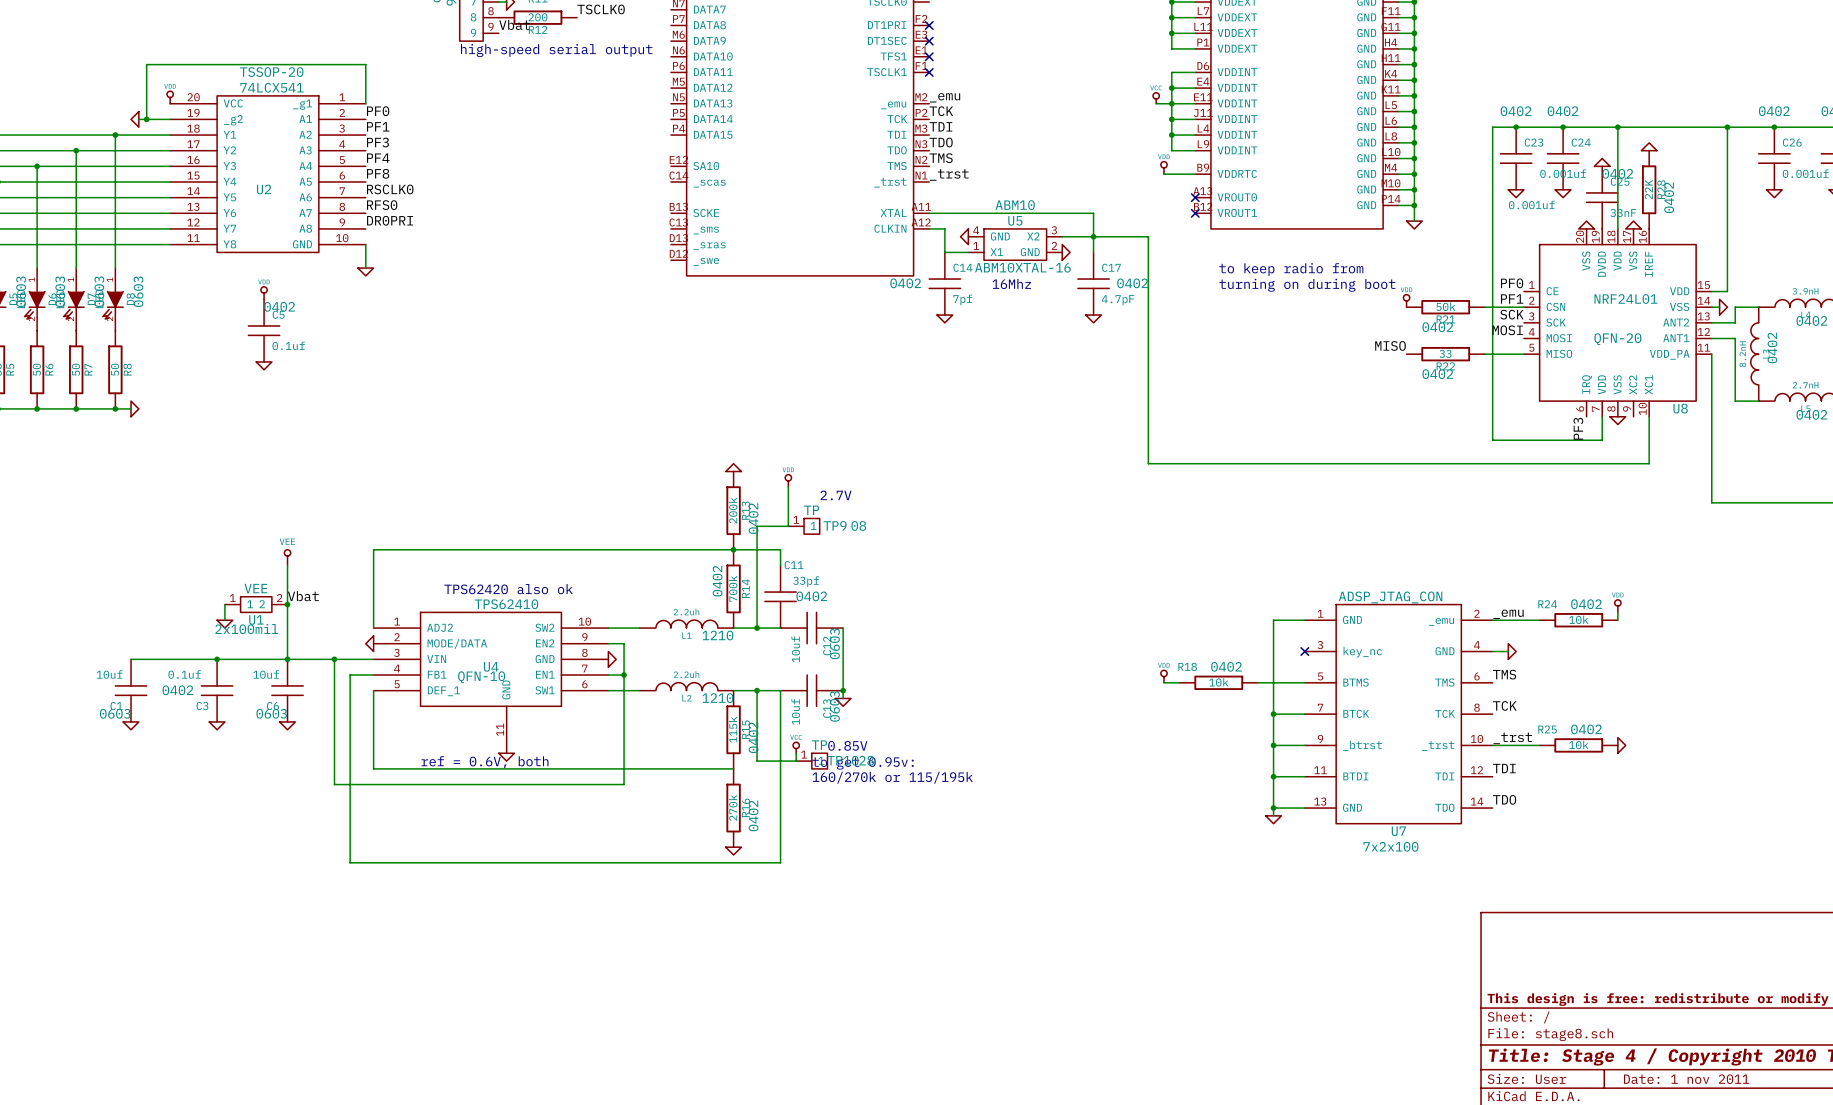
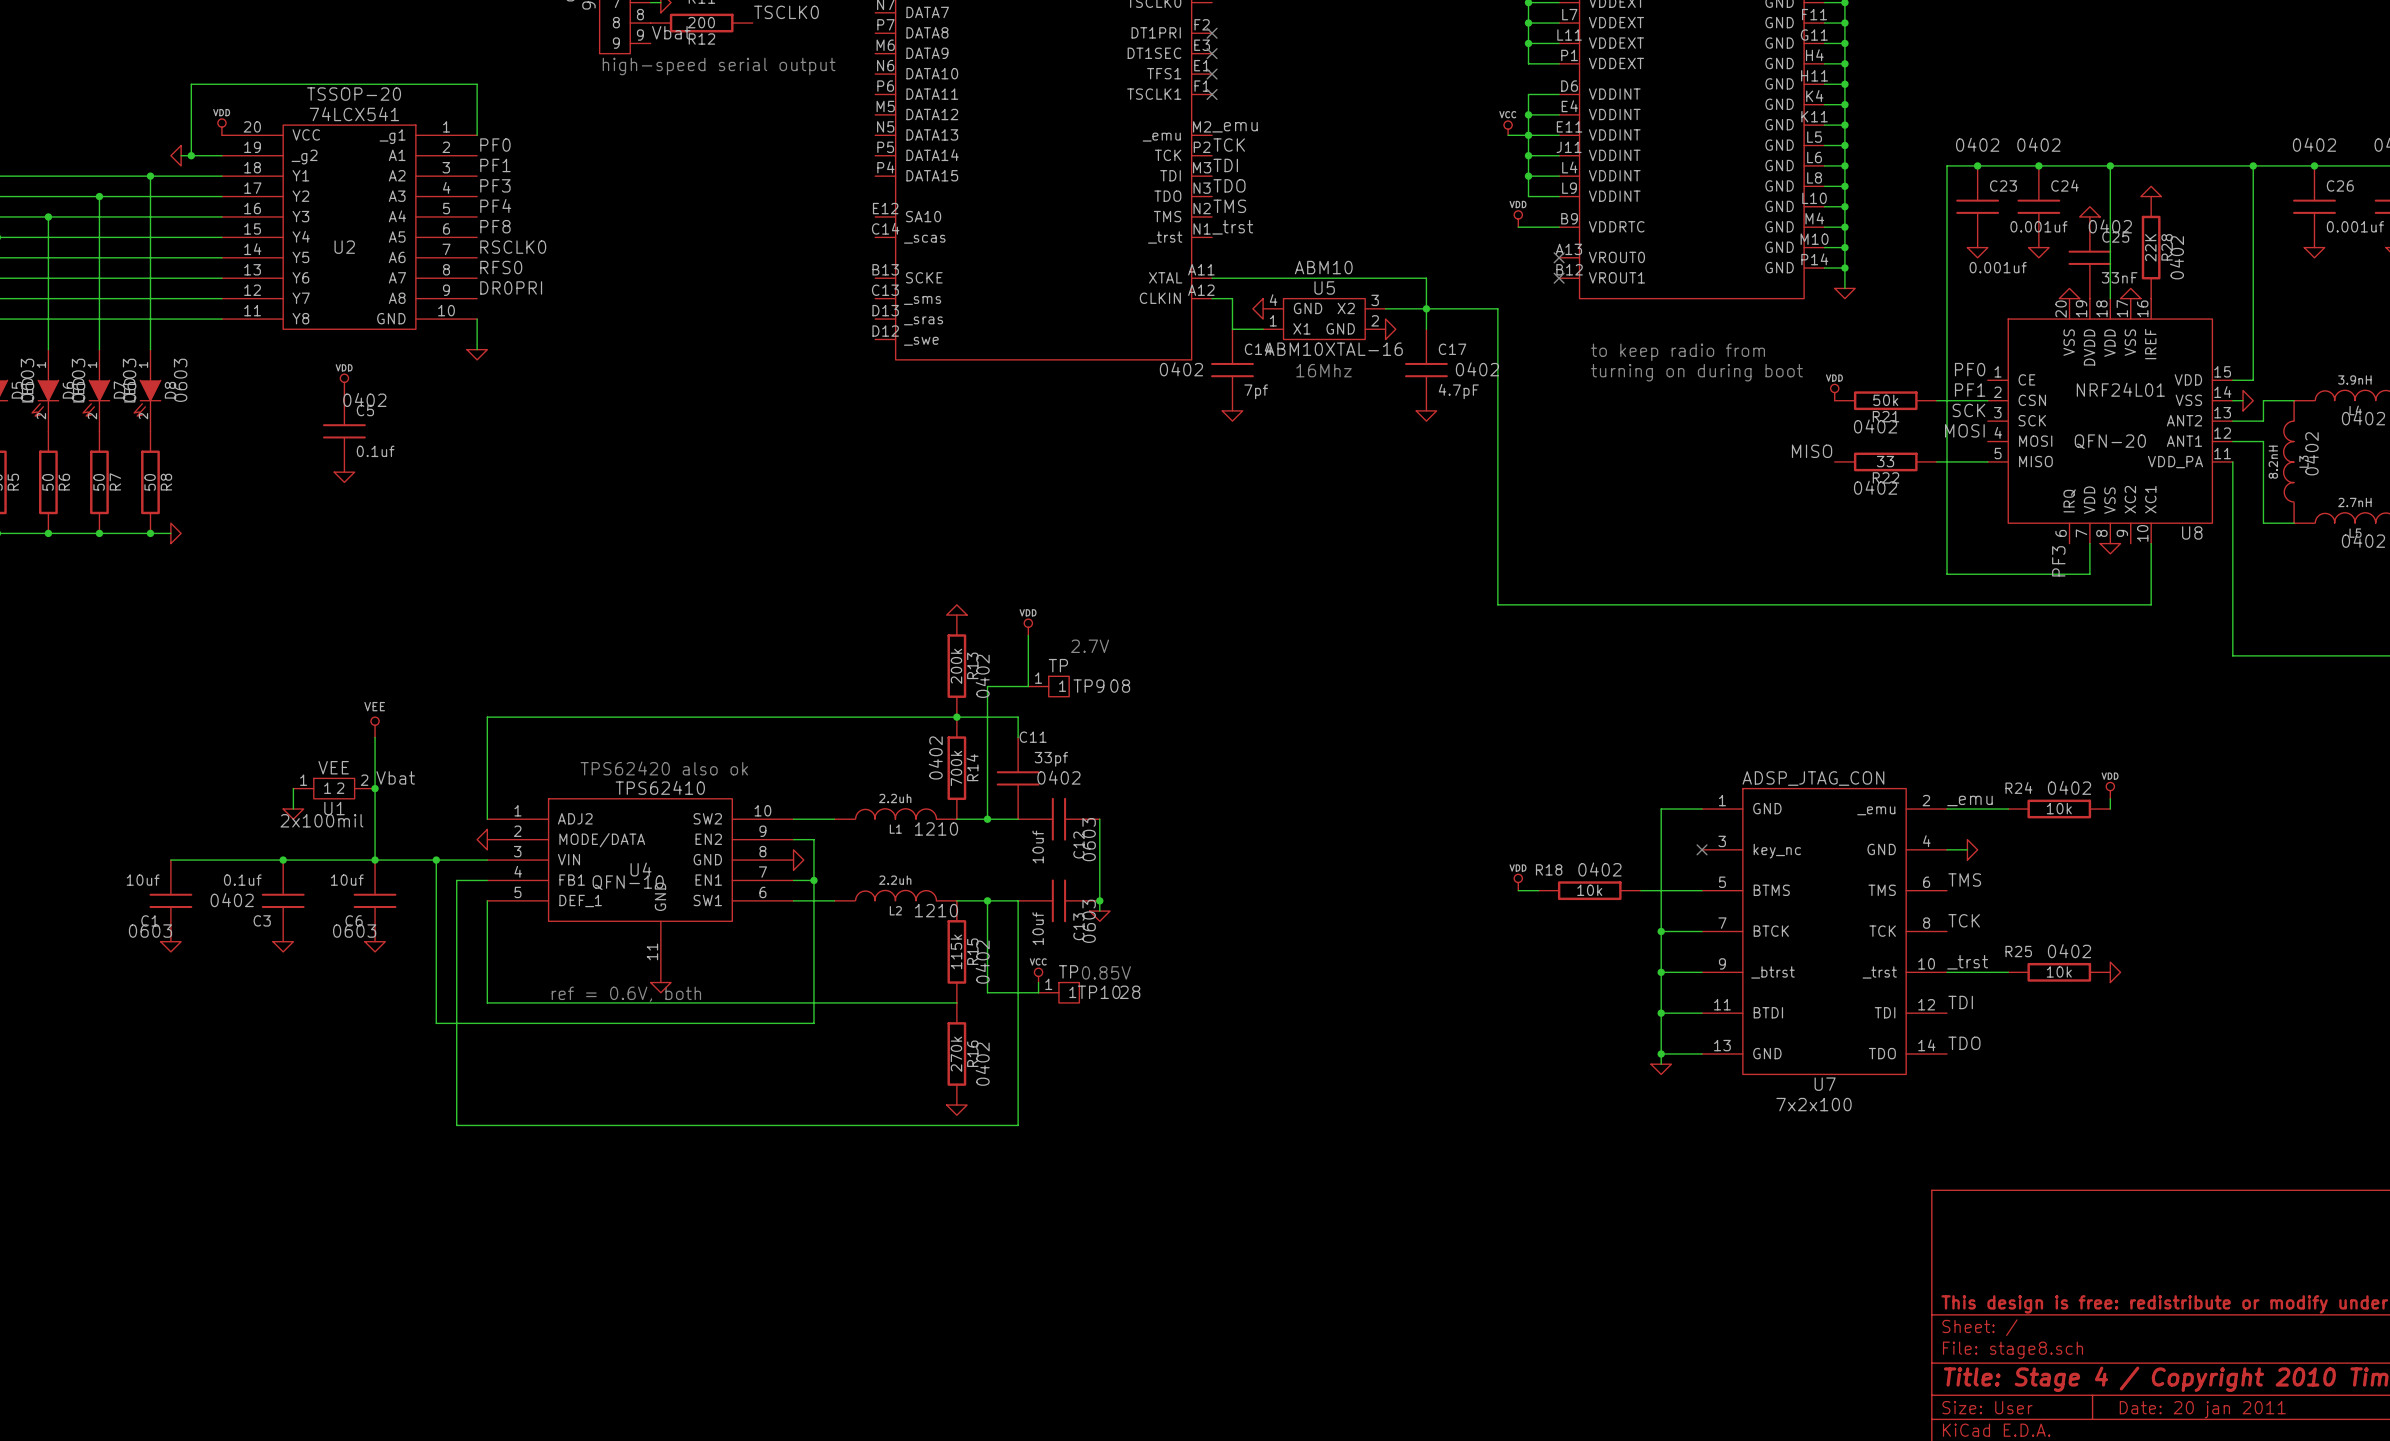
text: to get 0.95v: (863, 763) -> none
text: 160/270k or 115/195k (892, 777) -> none
title block: Date: 1 nov 2011 (1686, 1079) -> Date: 20 jan 2011 (2202, 1409)

